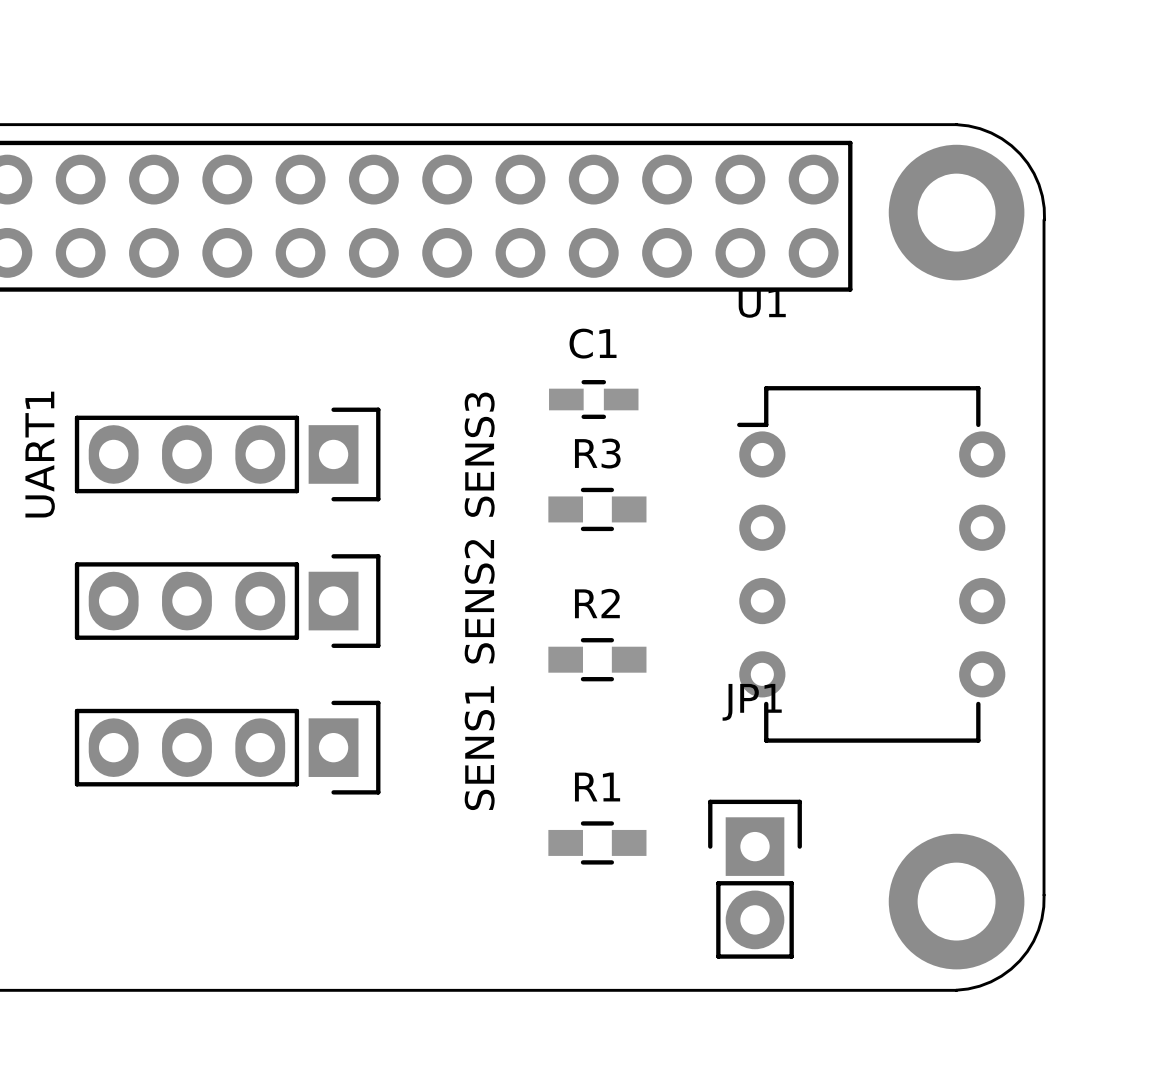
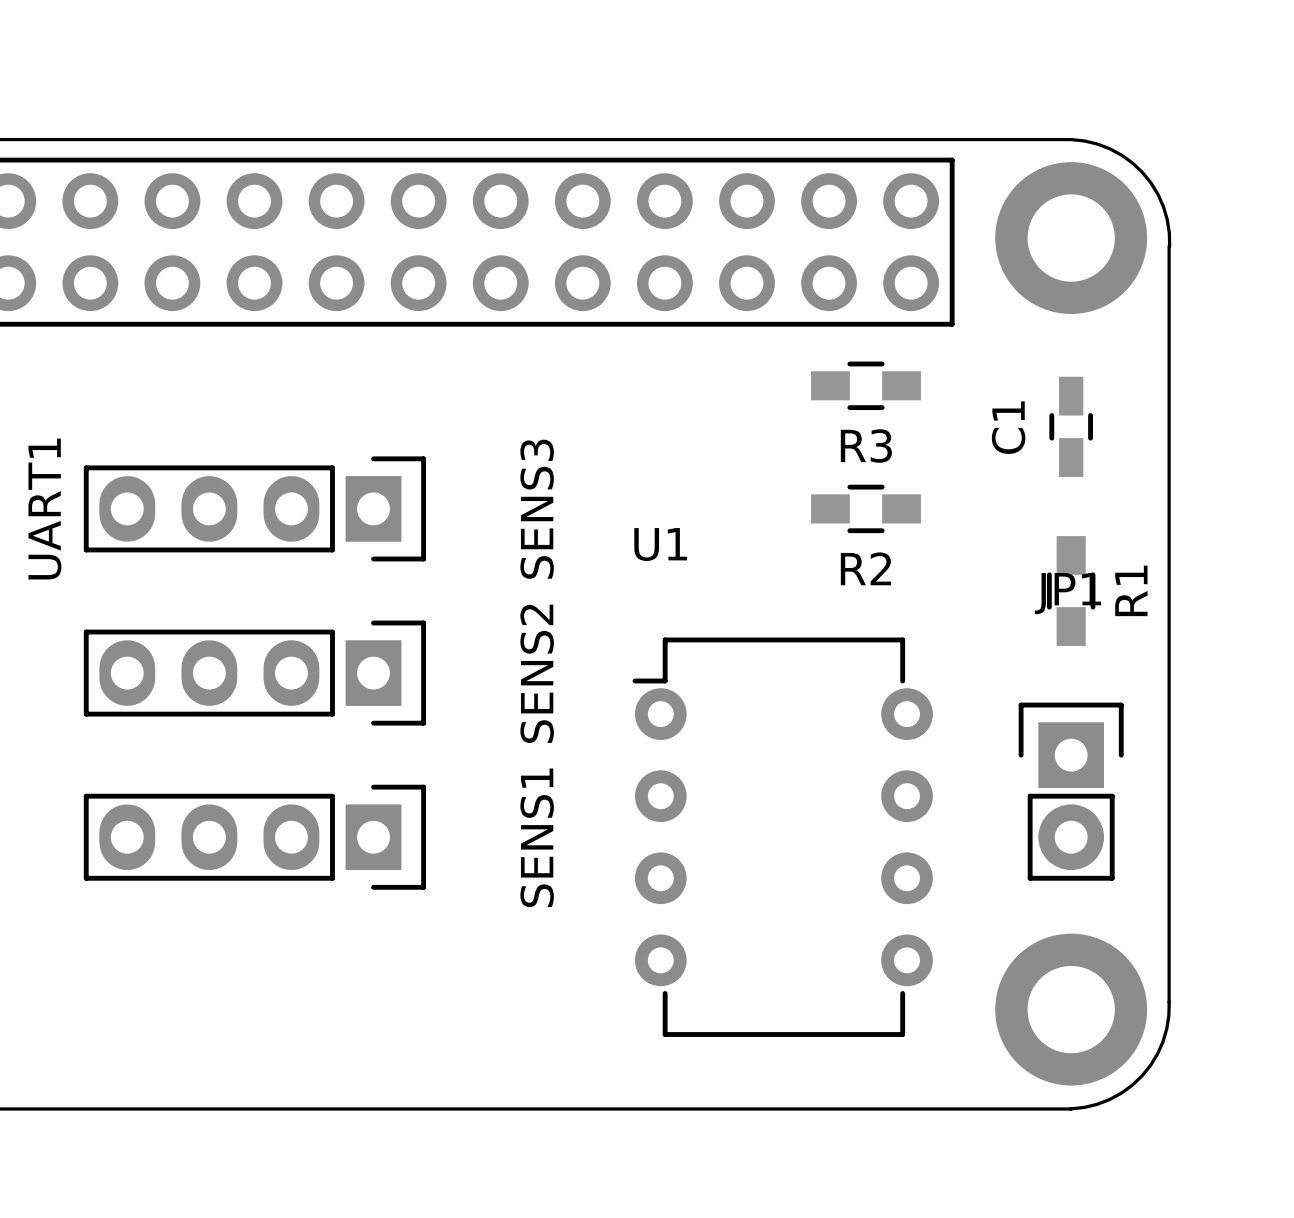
C1 name position: C1 (593, 343) -> C1 (1008, 427)
C1 rotation: 0° (593, 399) -> 90° clockwise (1071, 426)
C1 position: (593, 399) -> (1071, 426)
R3 name position: R3 (597, 453) -> R3 (866, 446)
R3 position: (597, 509) -> (865, 385)
U1 position: (871, 564) -> (782, 837)
R2 name position: R2 (597, 603) -> R2 (865, 568)
R2 position: (597, 659) -> (865, 508)
R1 rotation: 0° (597, 842) -> 90° clockwise (1071, 591)
R1 position: (597, 842) -> (1071, 591)
JP1 position: (755, 879) -> (1071, 791)

